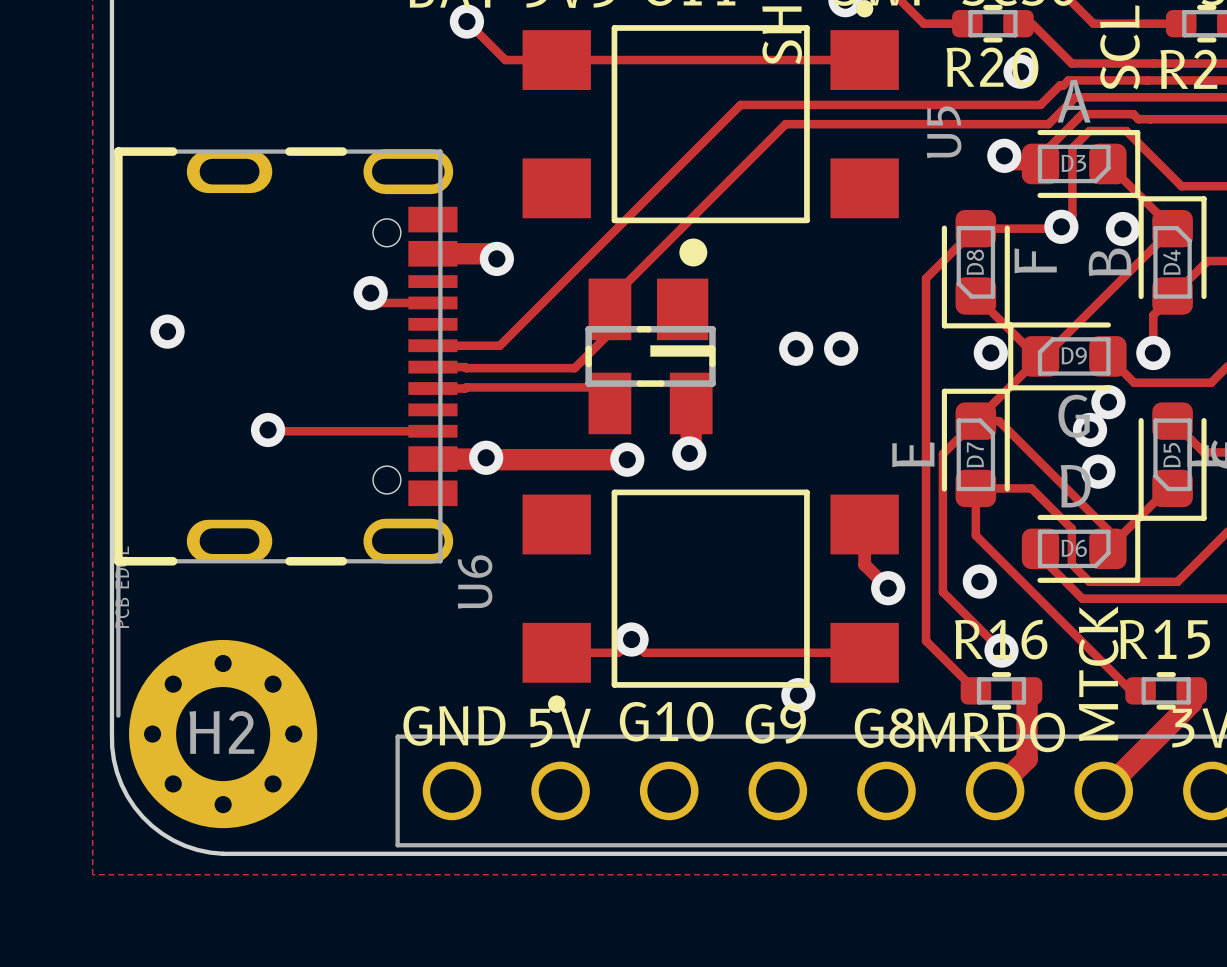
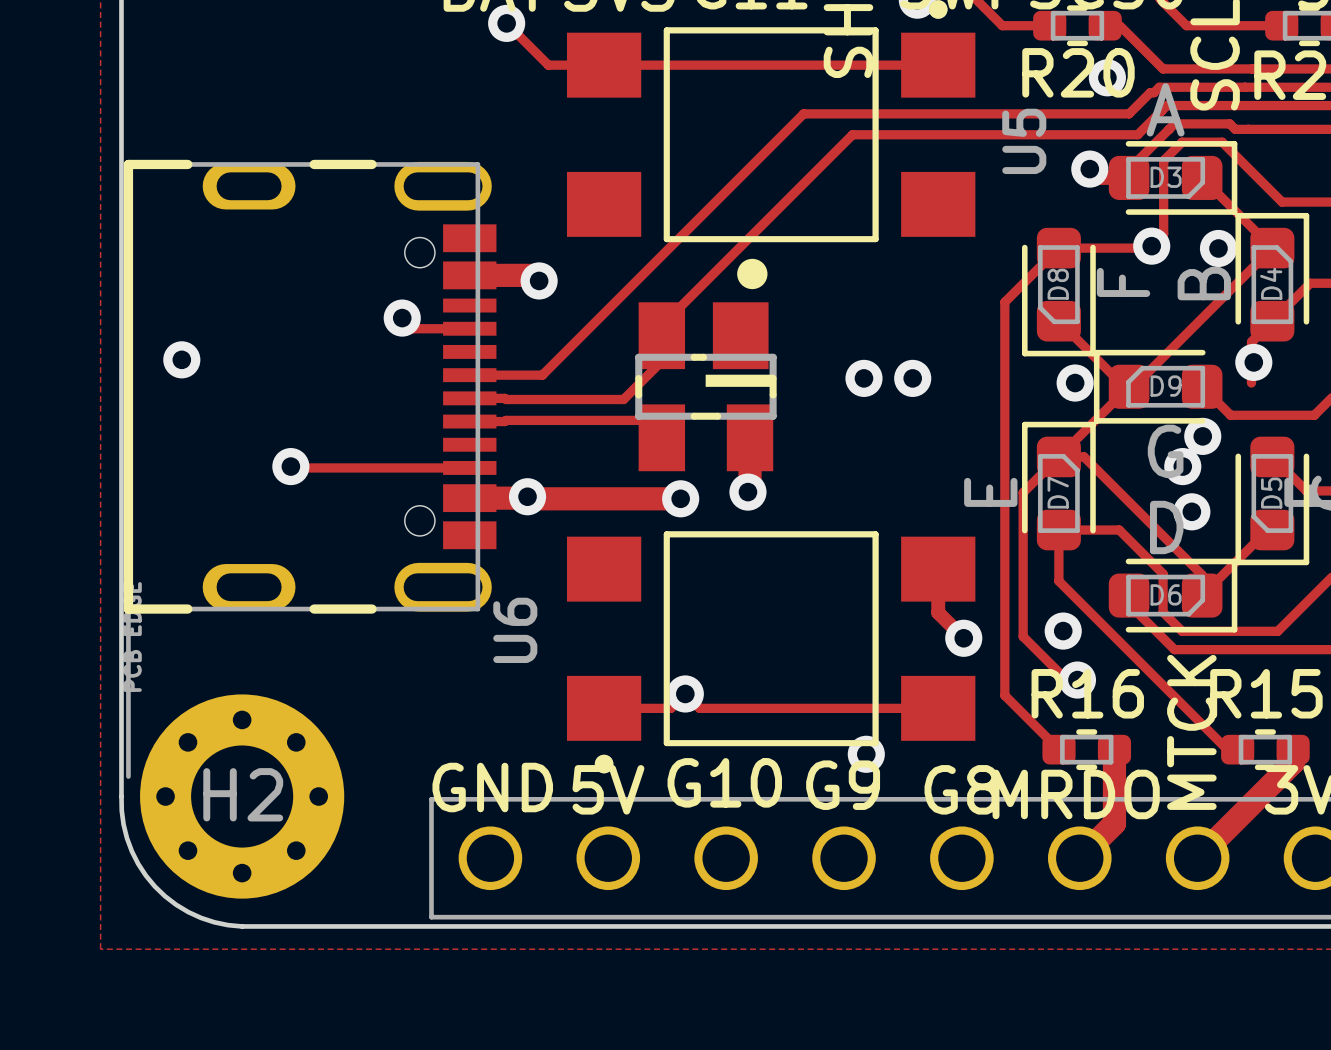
via position: (1153, 353) -> (1253, 362)
track: (942, 586) (942, 592) (1001, 650) -> (1023, 636) (1066, 680) (1077, 680)
via position: (1001, 650) -> (1077, 680)

